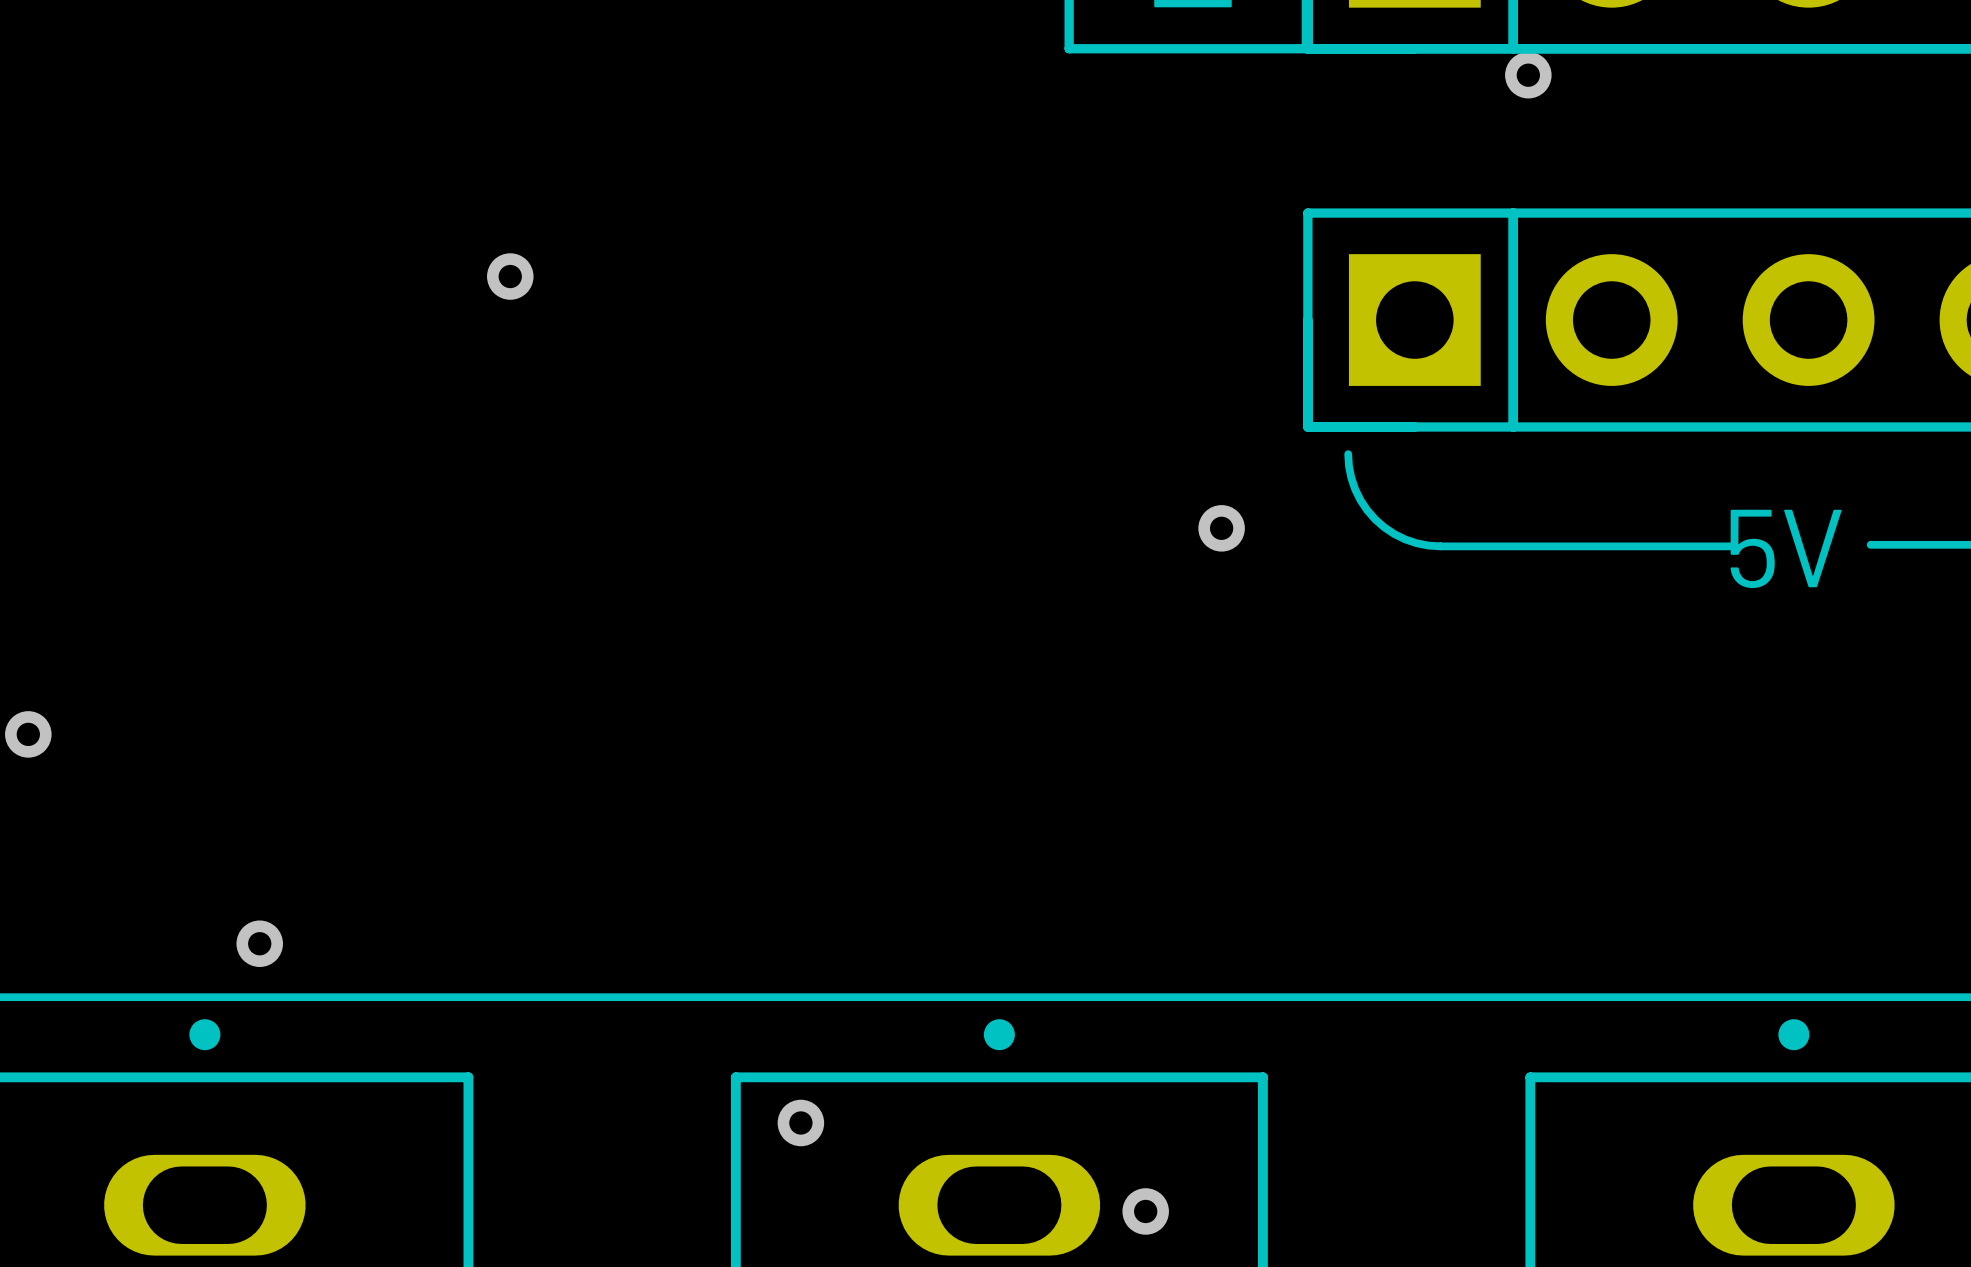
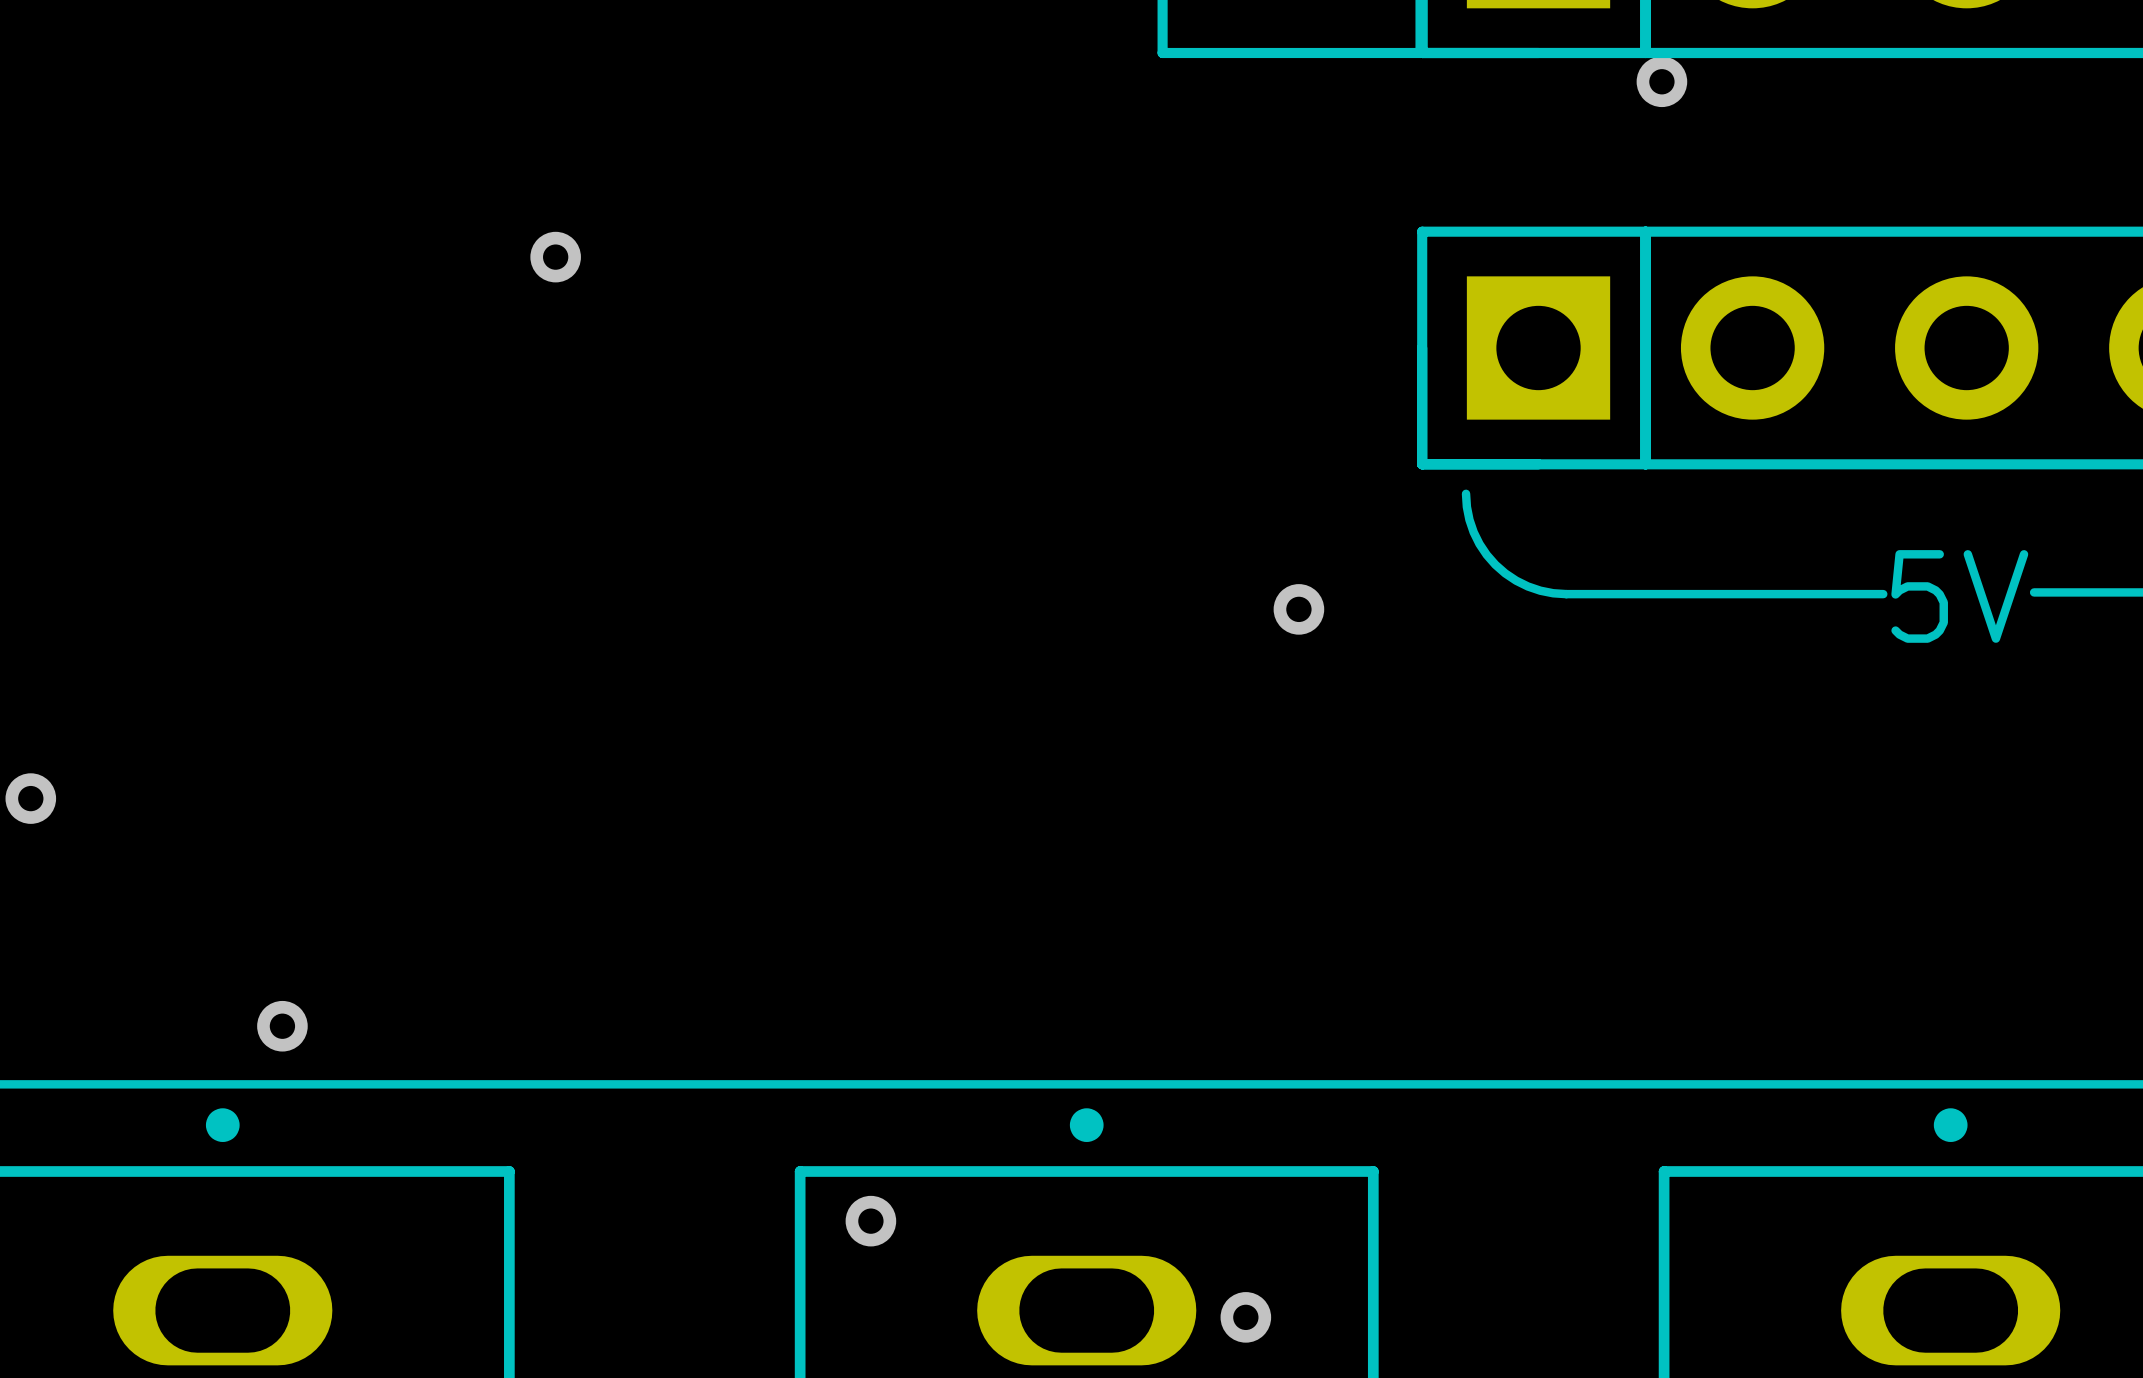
via position: (510, 276) -> (555, 257)
via position: (1221, 528) -> (1298, 609)

